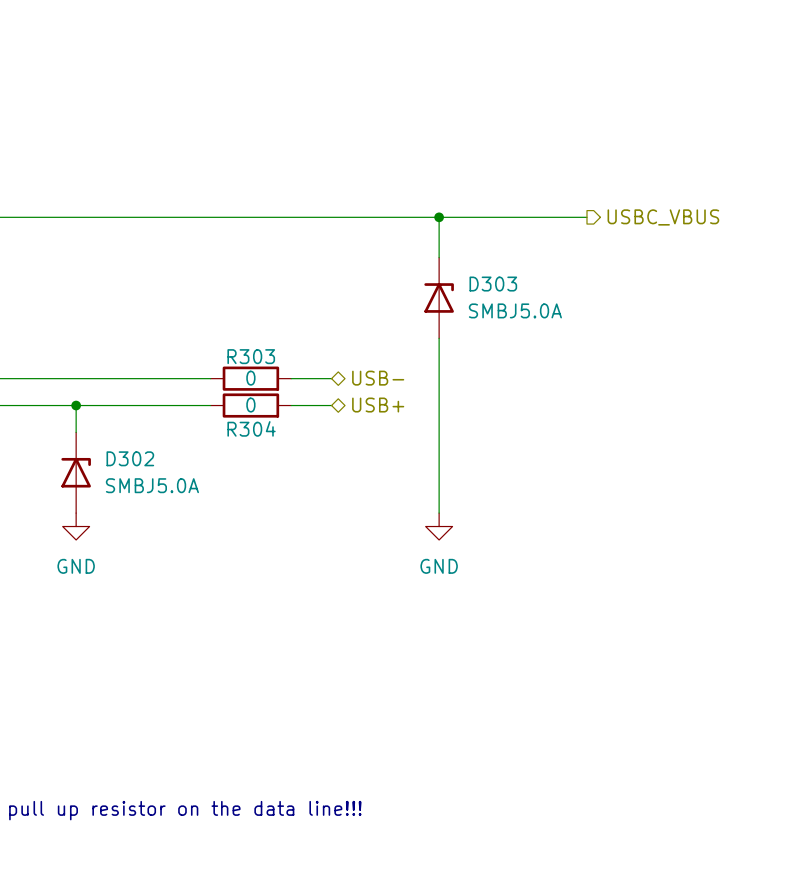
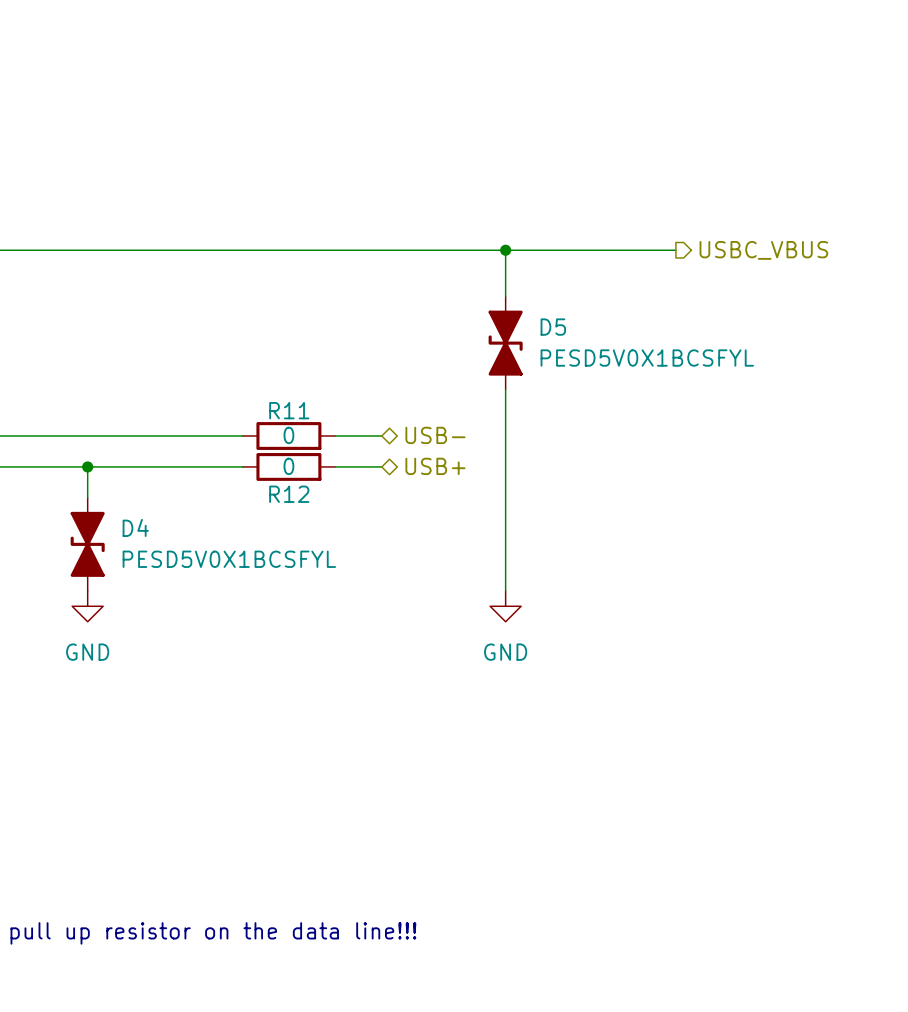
D303: SMBJ5.0A (439, 297) -> none
D5: none -> PESD5V0X1BCSFYL (505, 343)
R303 name: R303 (251, 356) -> R11 (289, 410)
R304 name: R304 (251, 428) -> R12 (289, 494)
D302: SMBJ5.0A (76, 472) -> none
D4: none -> PESD5V0X1BCSFYL (87, 544)

